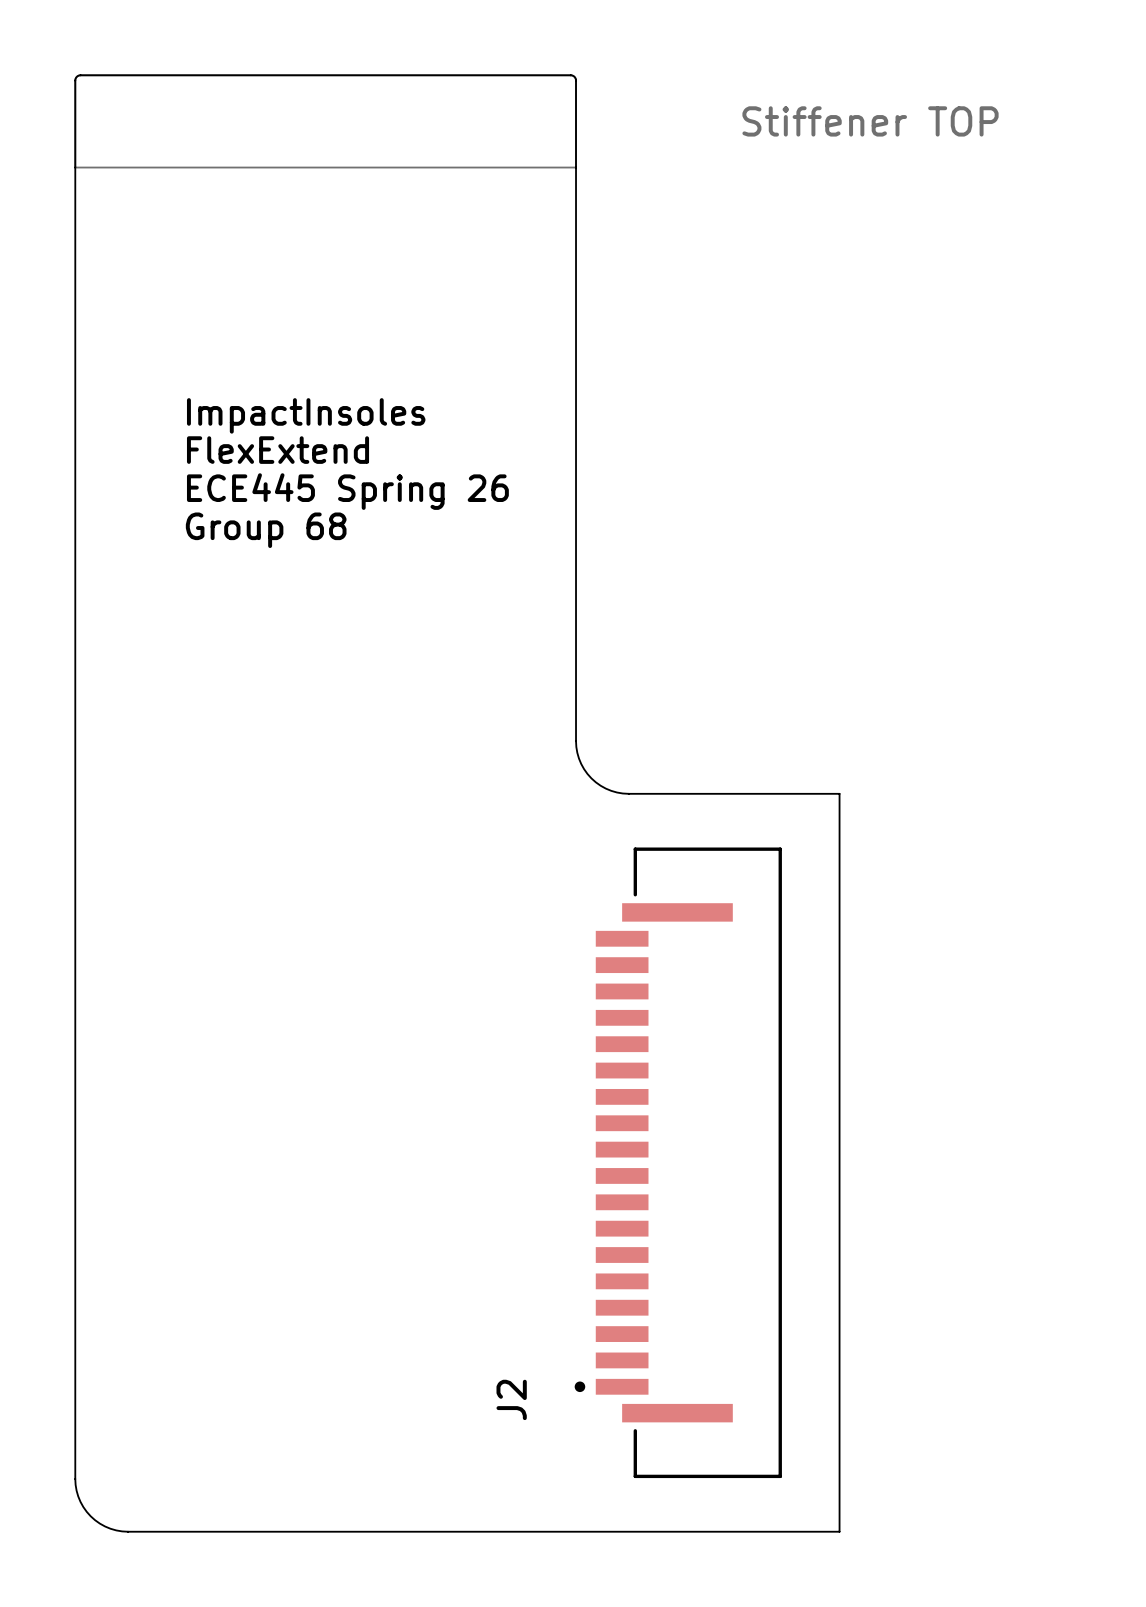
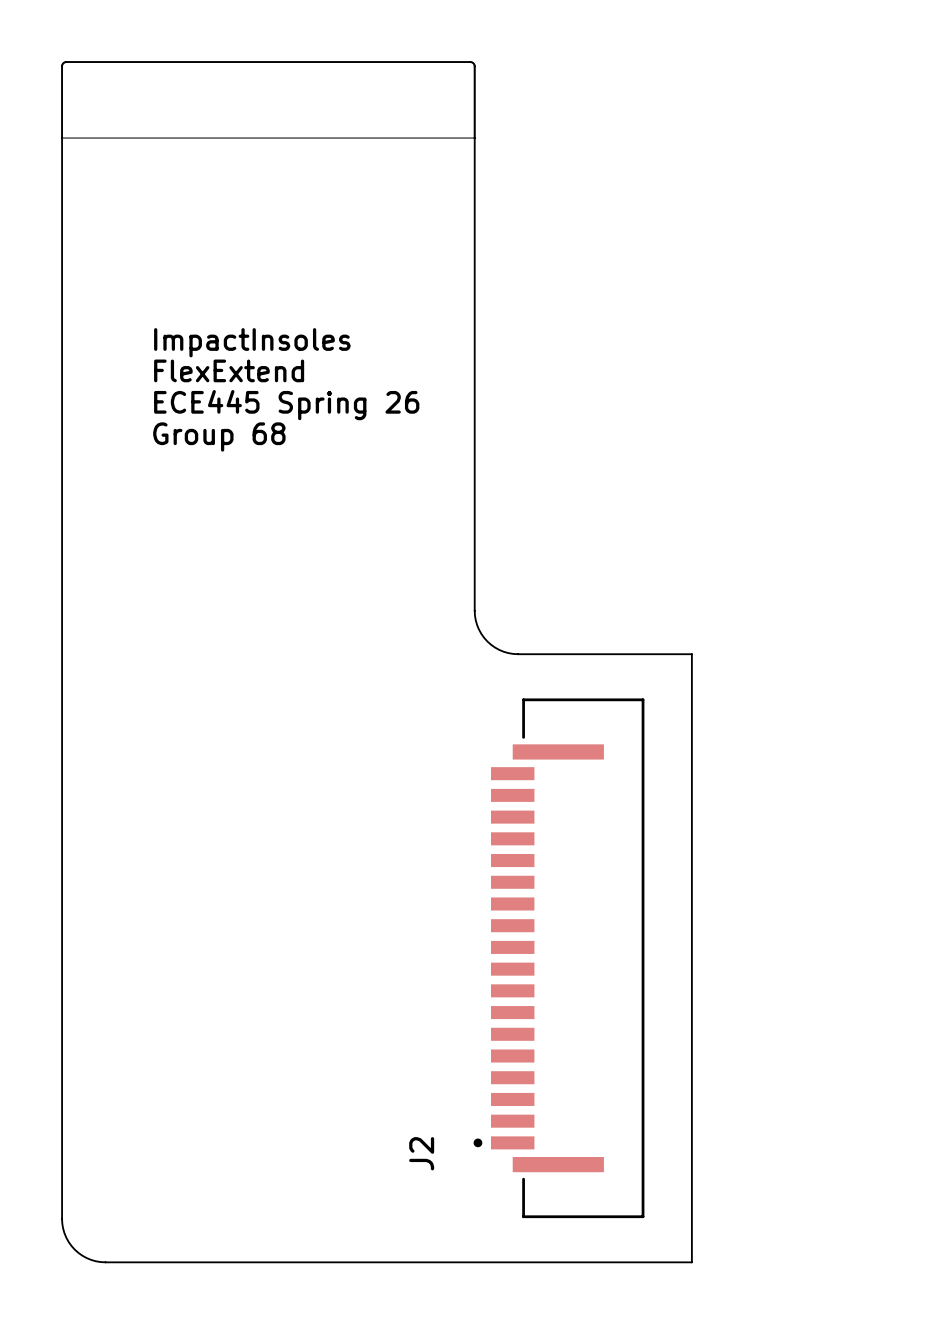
text: Stiffener TOP (870, 121) -> none

